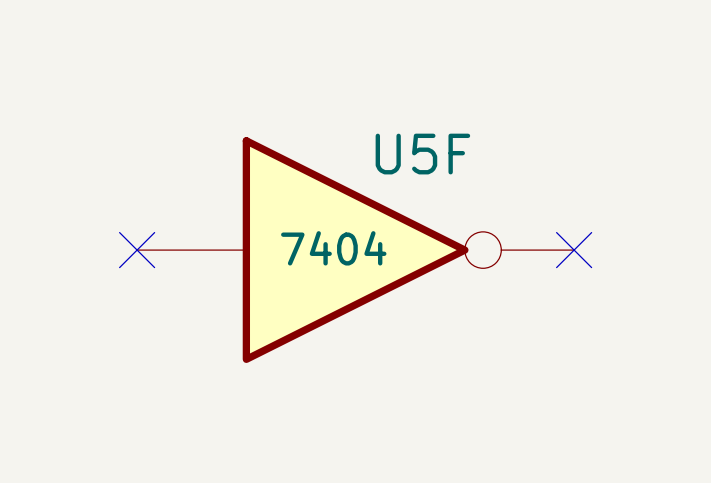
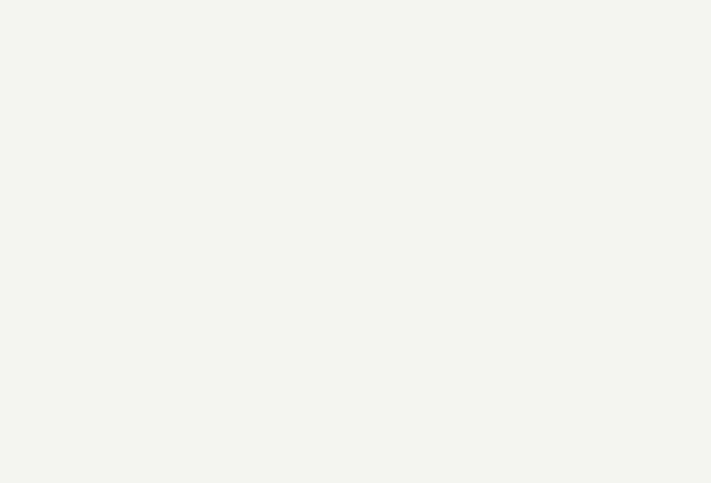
no-connect mark: (137, 250) -> none
U5F: 7404 (355, 250) -> none
no-connect mark: (574, 250) -> none

